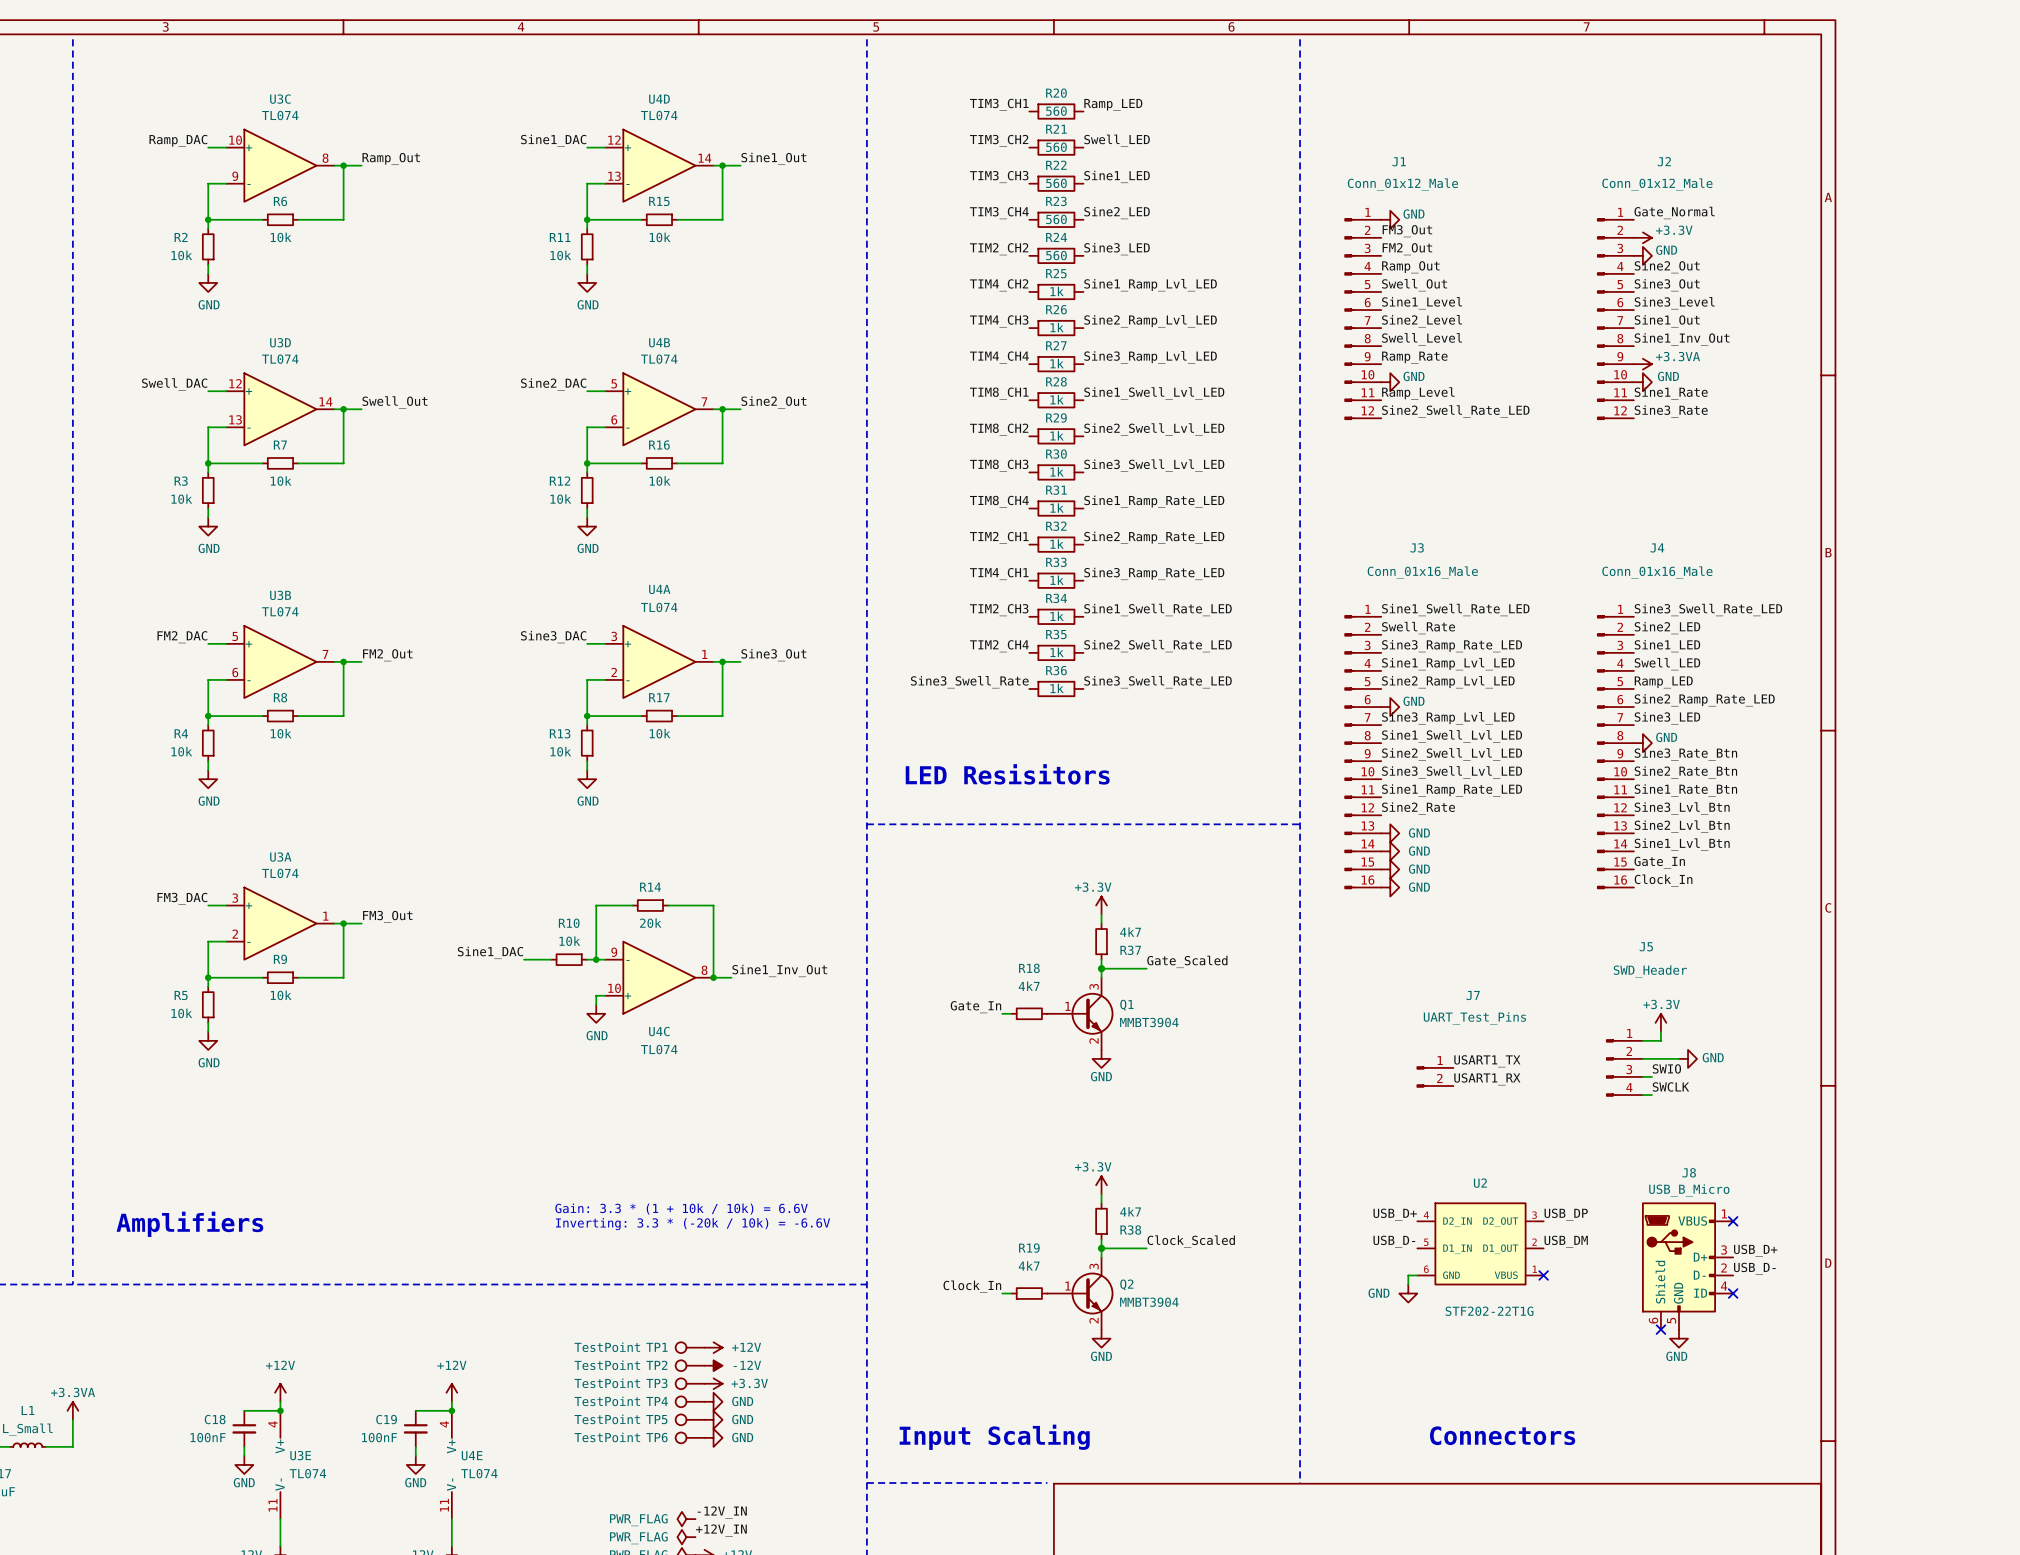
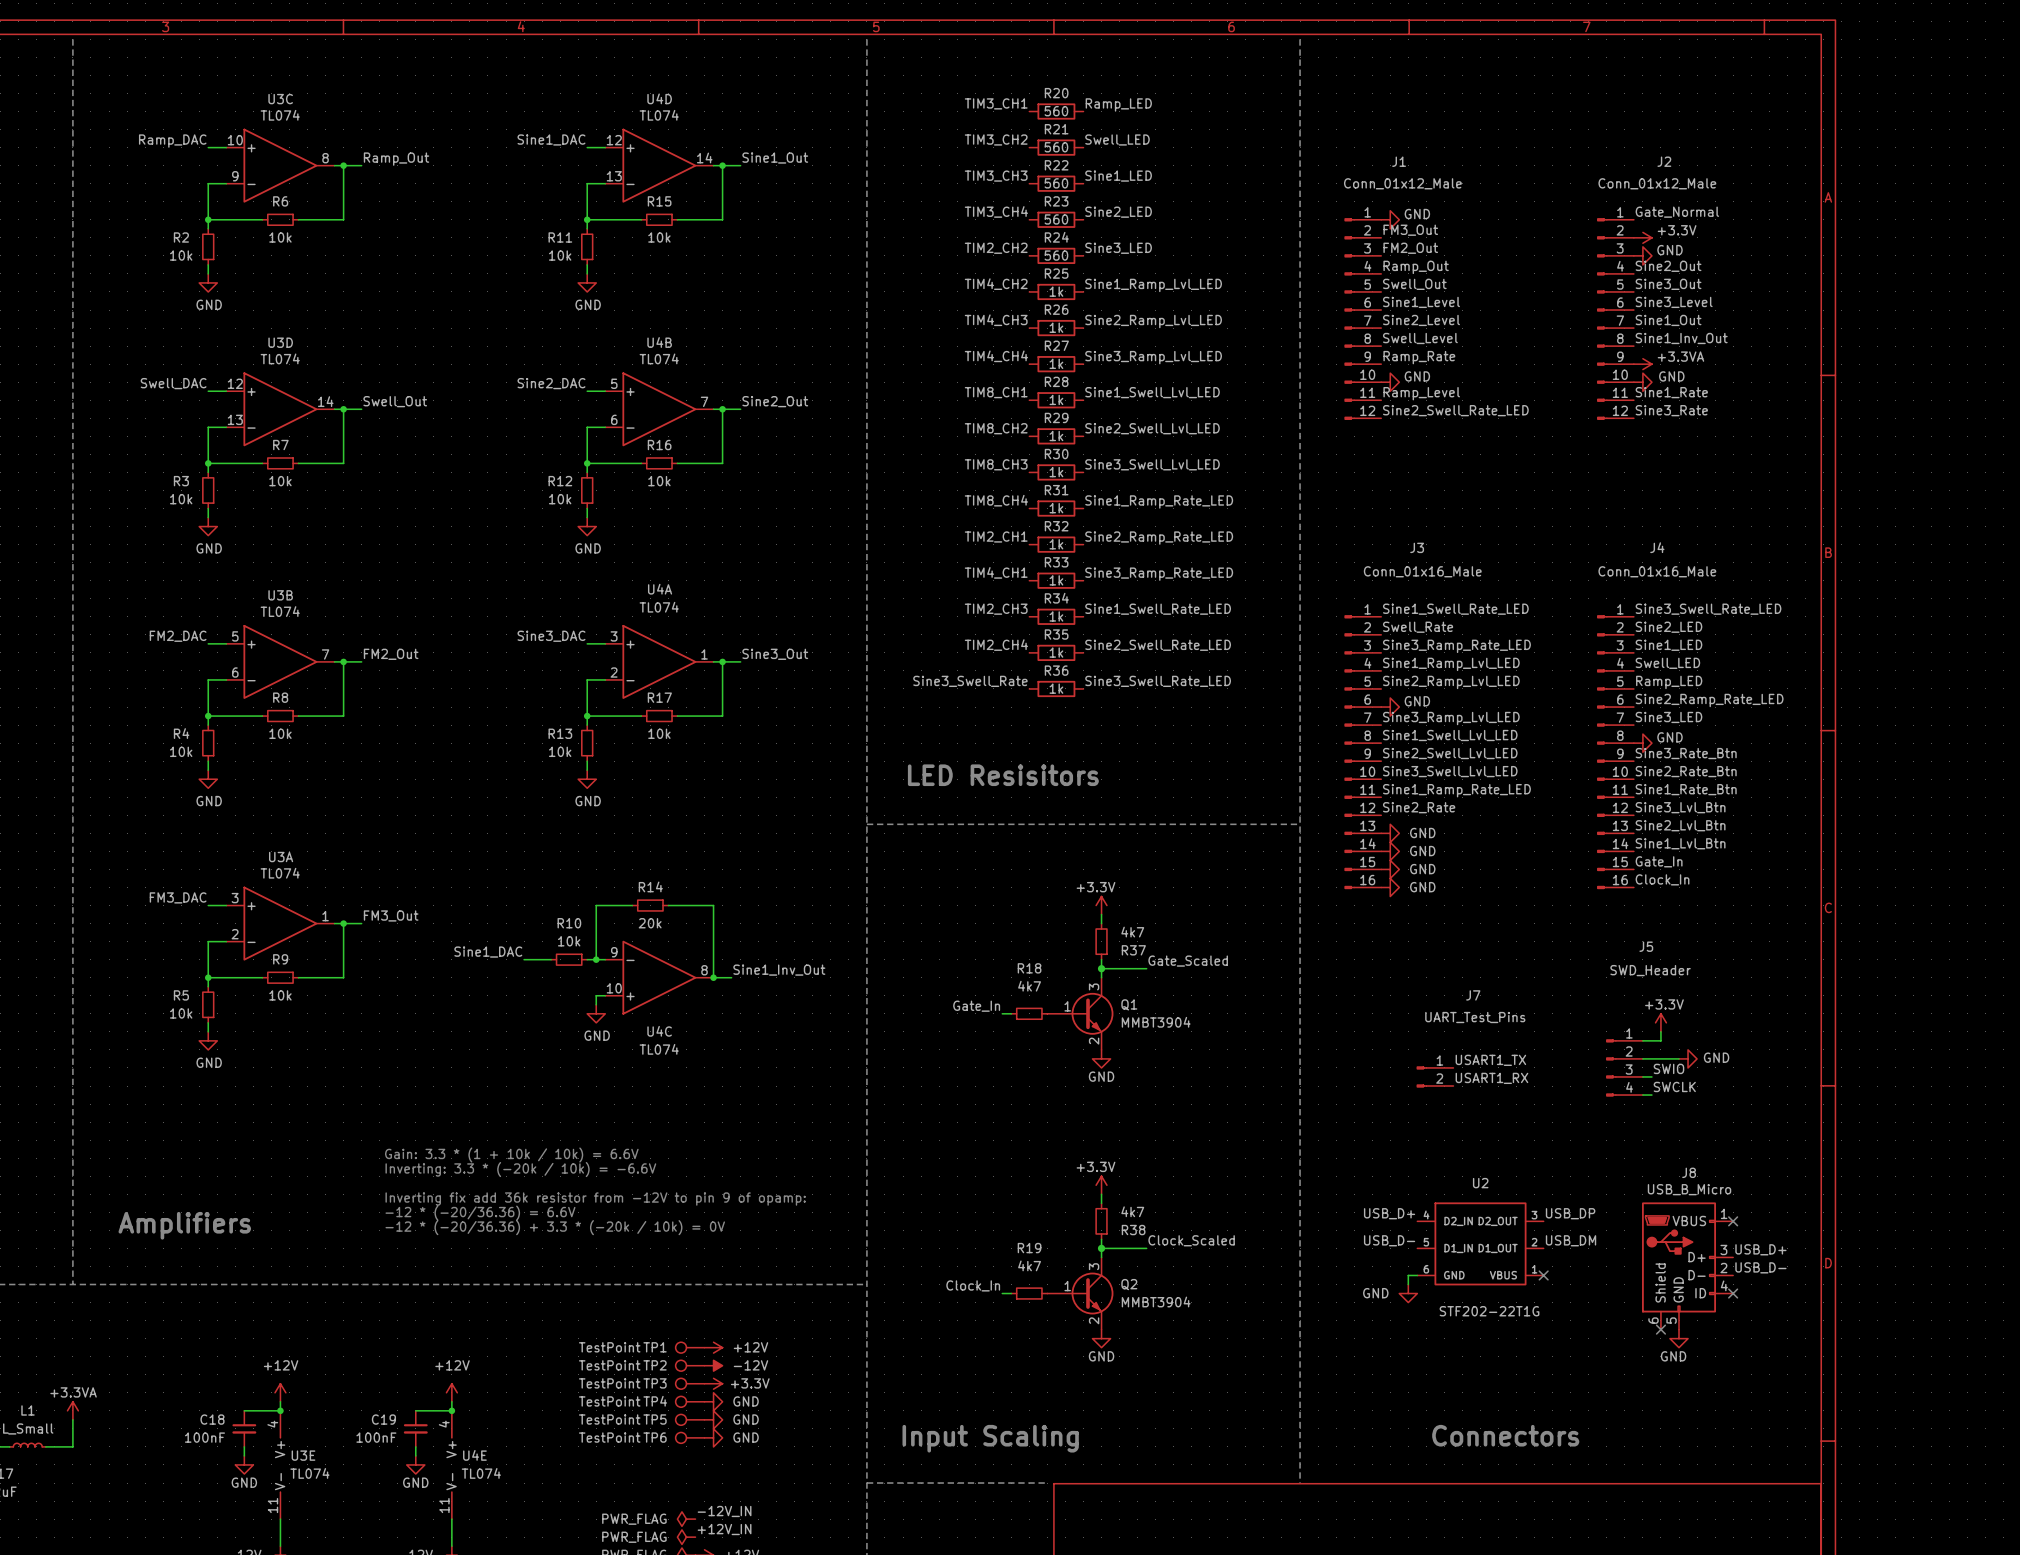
text: none -> Gain: 3.3 * (1 + 10k / 10k) = 6.6V (511, 1155)
text: none -> Inverting: 3.3 * (-20k / 10k) = -6.6V (520, 1169)
text: none -> Inverting fix add 36k resistor from -12V to pin 9 of opamp: (595, 1199)
text: Gain: 3.3 * (1 + 10k / 10k) = 6.6V (681, 1209) -> none
text: none -> -12 * (-20/36.36) = 6.6V (480, 1213)
text: Inverting: 3.3 * (-20k / 10k) = -6.6V (693, 1224) -> none
text: none -> -12 * (-20/36.36) + 3.3 * (-20k / 10k) = 0V (555, 1227)

